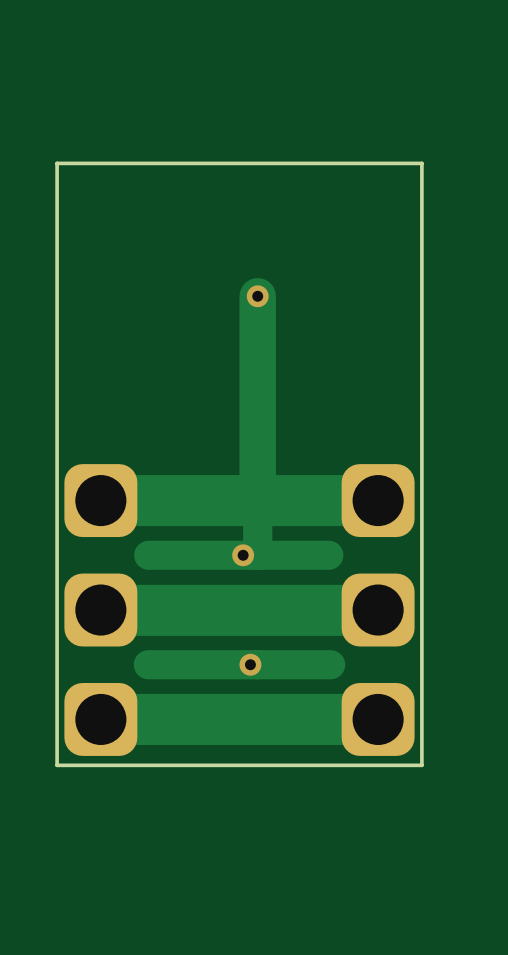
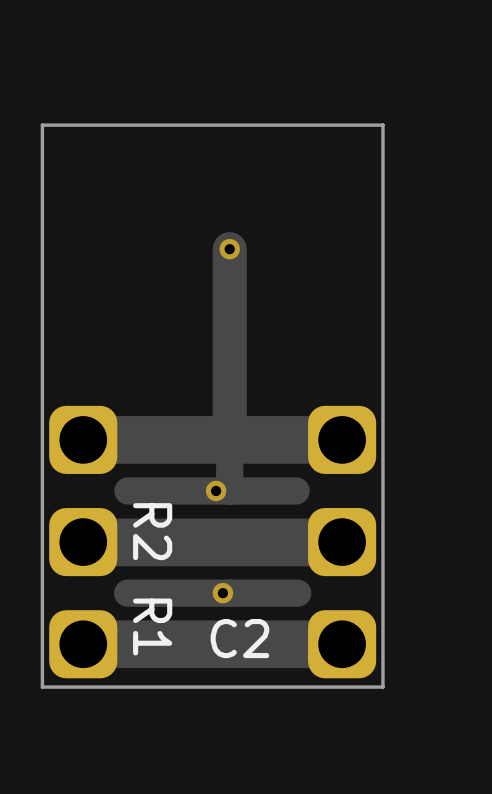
R2: none -> (152, 531)
R1: none -> (152, 627)
C2: none -> (239, 638)

